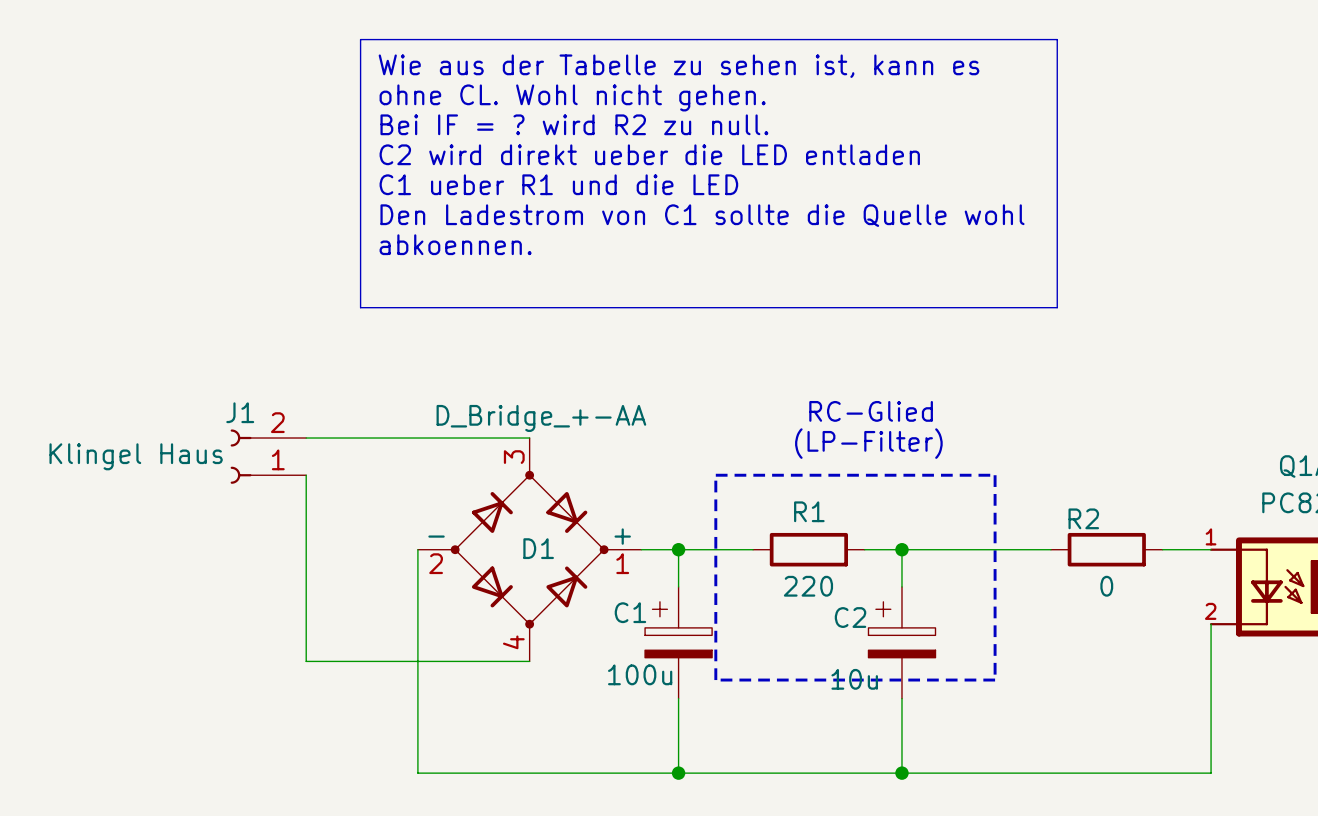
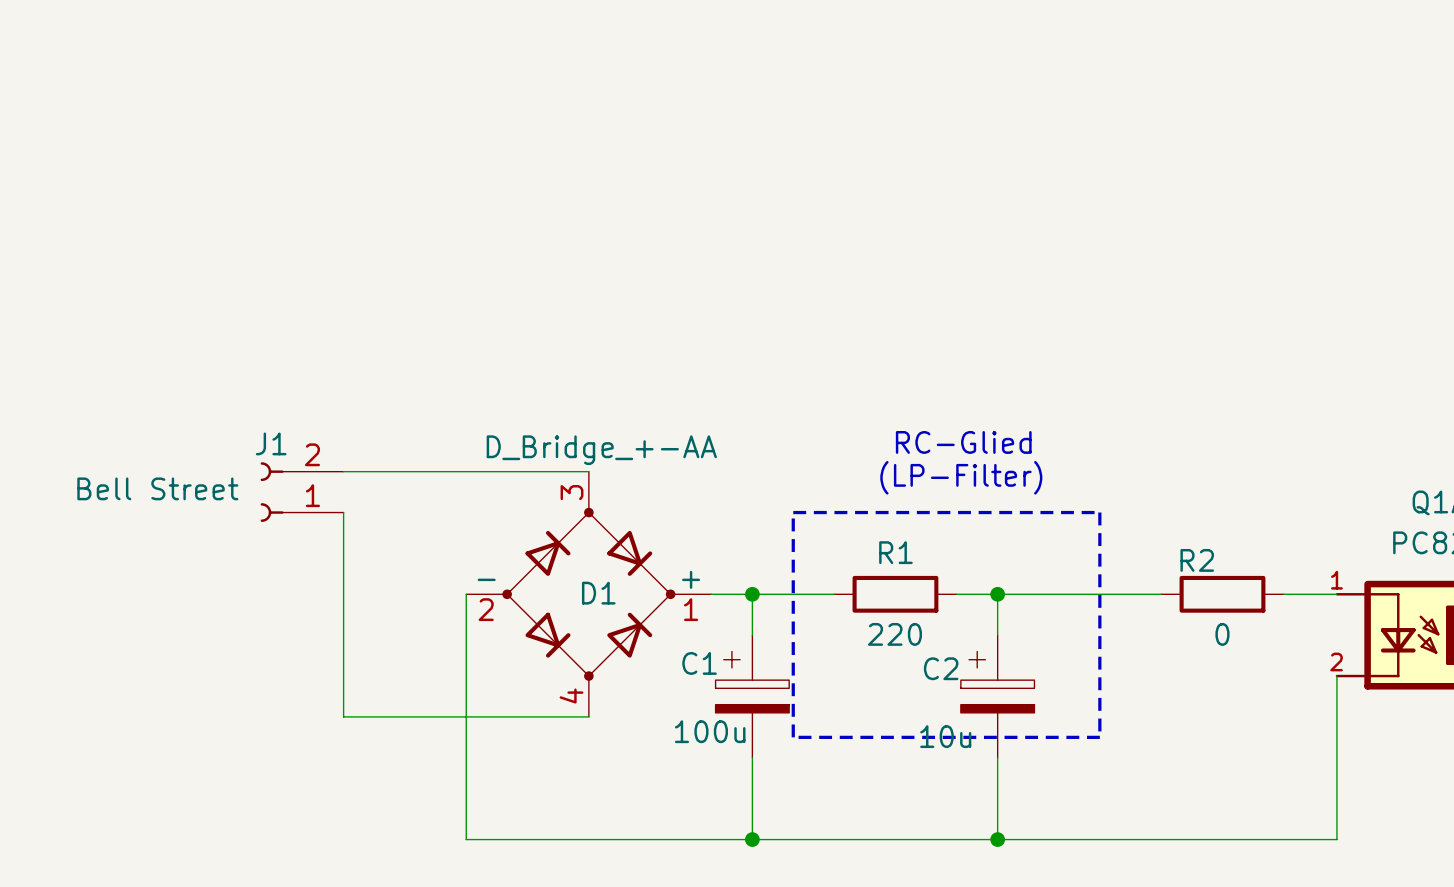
line: (360, 39) (1057, 39) (1057, 307) (360, 307) (360, 39) -> none
text: Wie aus der Tabelle zu sehen ist, kann es (679, 66) -> none
text: ohne CL. Wohl nicht gehen. (572, 97) -> none
text: Bei IF = ? wird R2 zu null. (574, 124) -> none
text: C2 wird direkt ueber die LED entladen (649, 154) -> none
text: C1 ueber R1 und die LED (558, 184) -> none
text: Den Ladestrom von C1 sollte die Quelle wohl (702, 215) -> none
text: abkoennen. (455, 244) -> none
J1 value: Klingel Haus (136, 456) -> Bell Street (157, 488)

